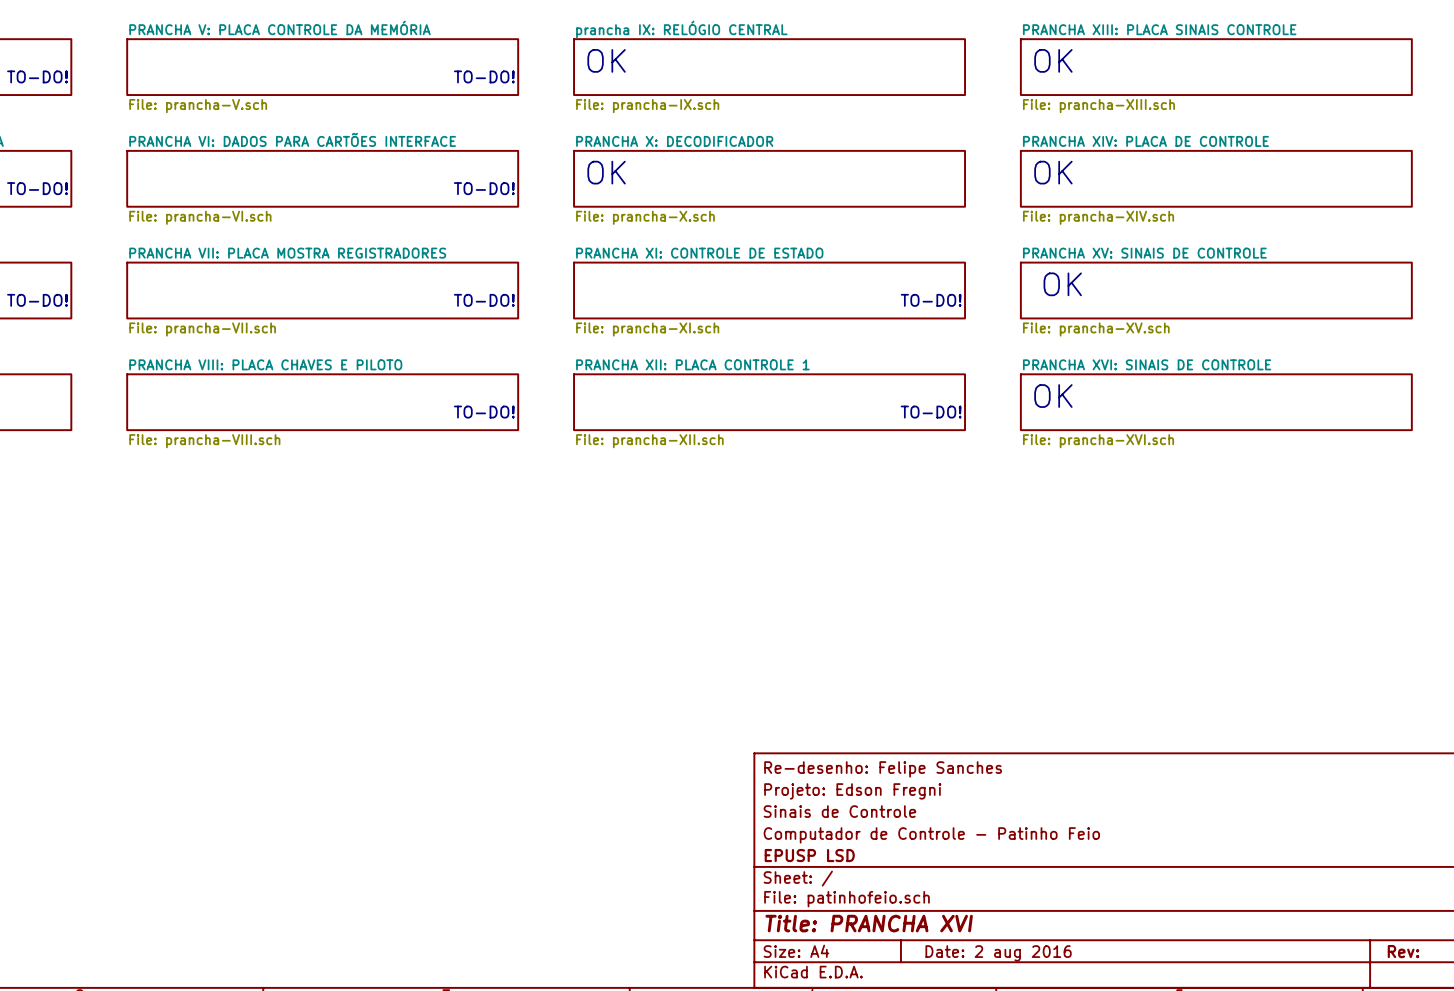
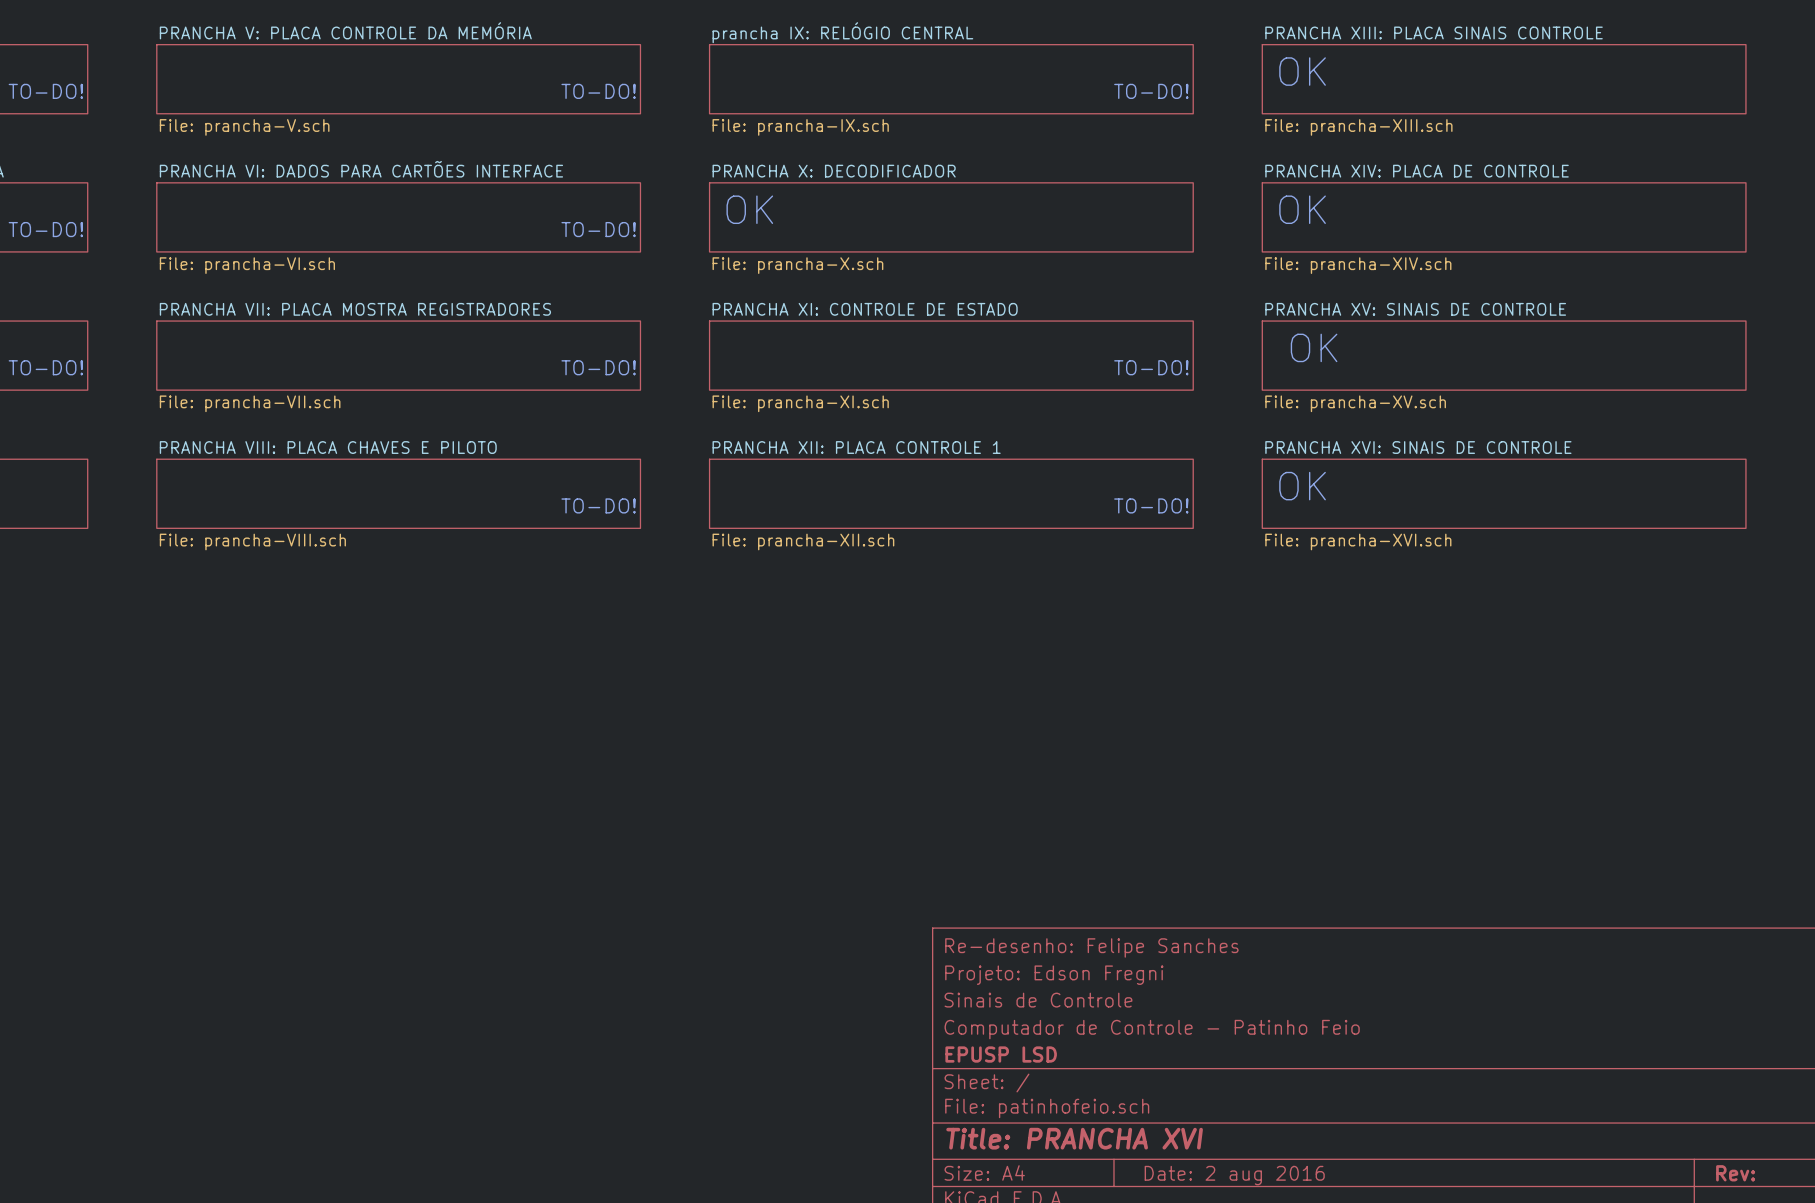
text: OK (606, 60) -> none
text: none -> TO-DO! (1151, 91)

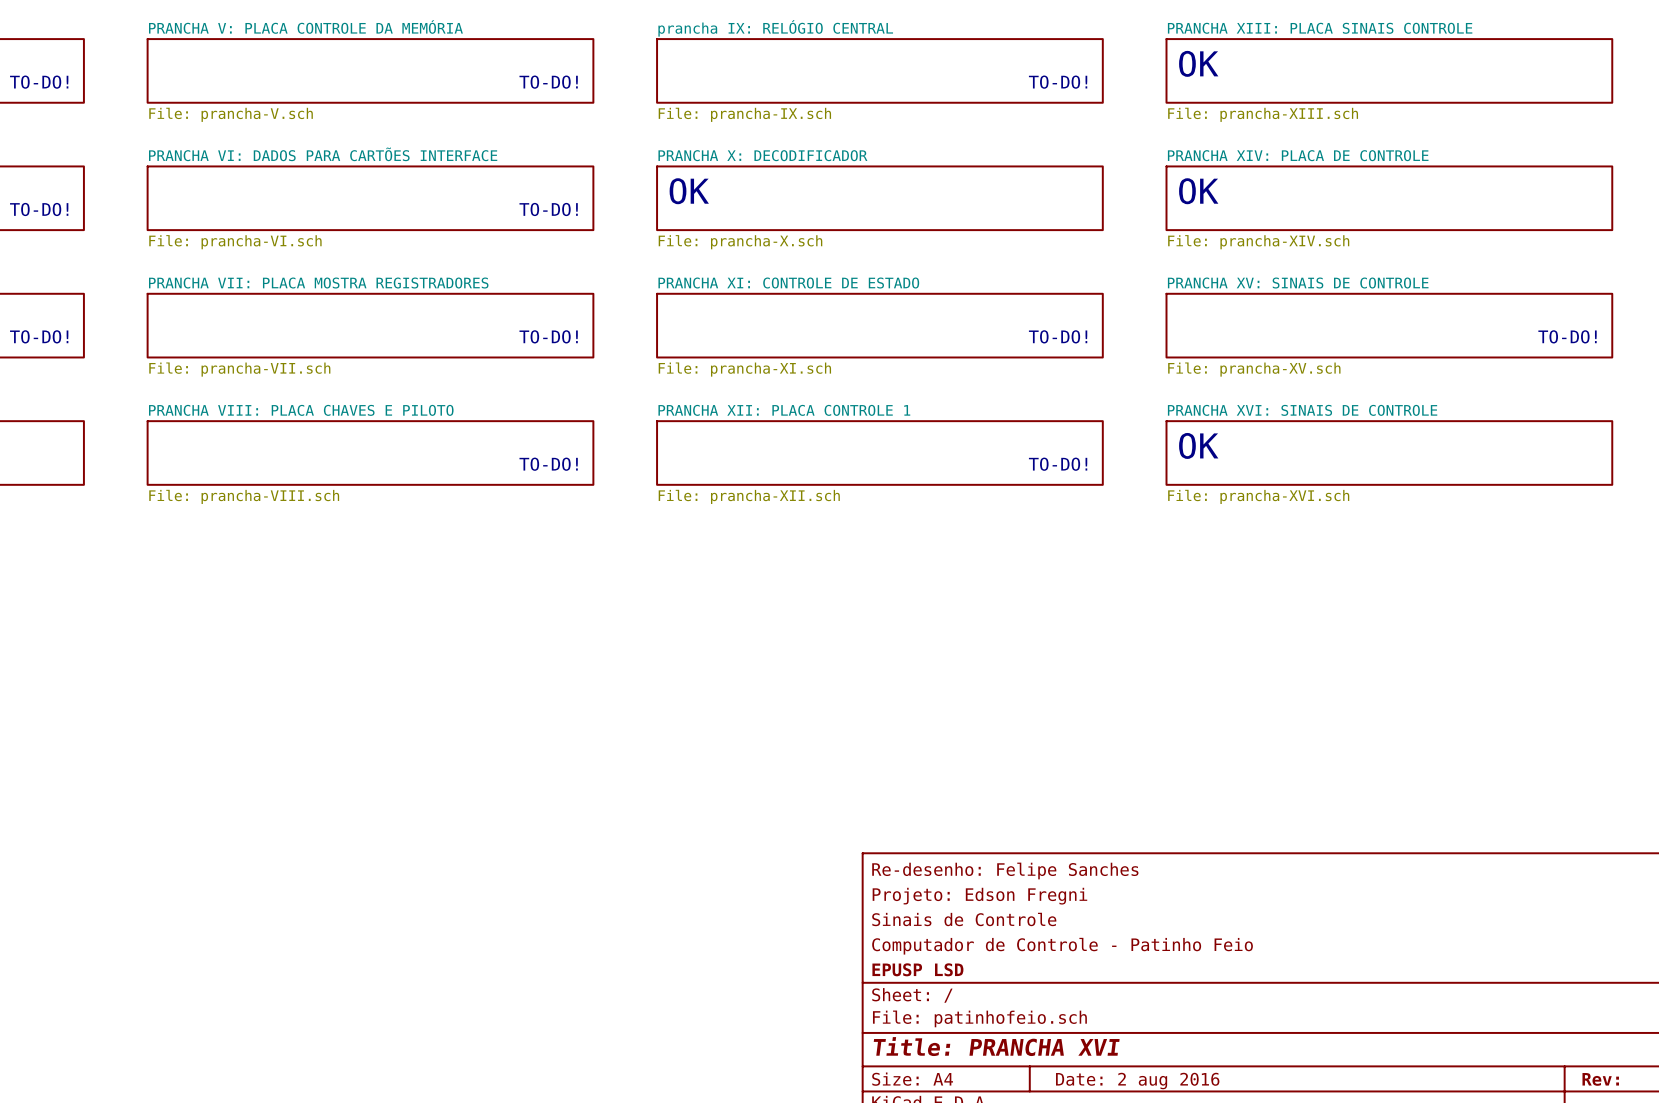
text: OK (1314, 347) -> none
text: none -> TO-DO! (1567, 336)

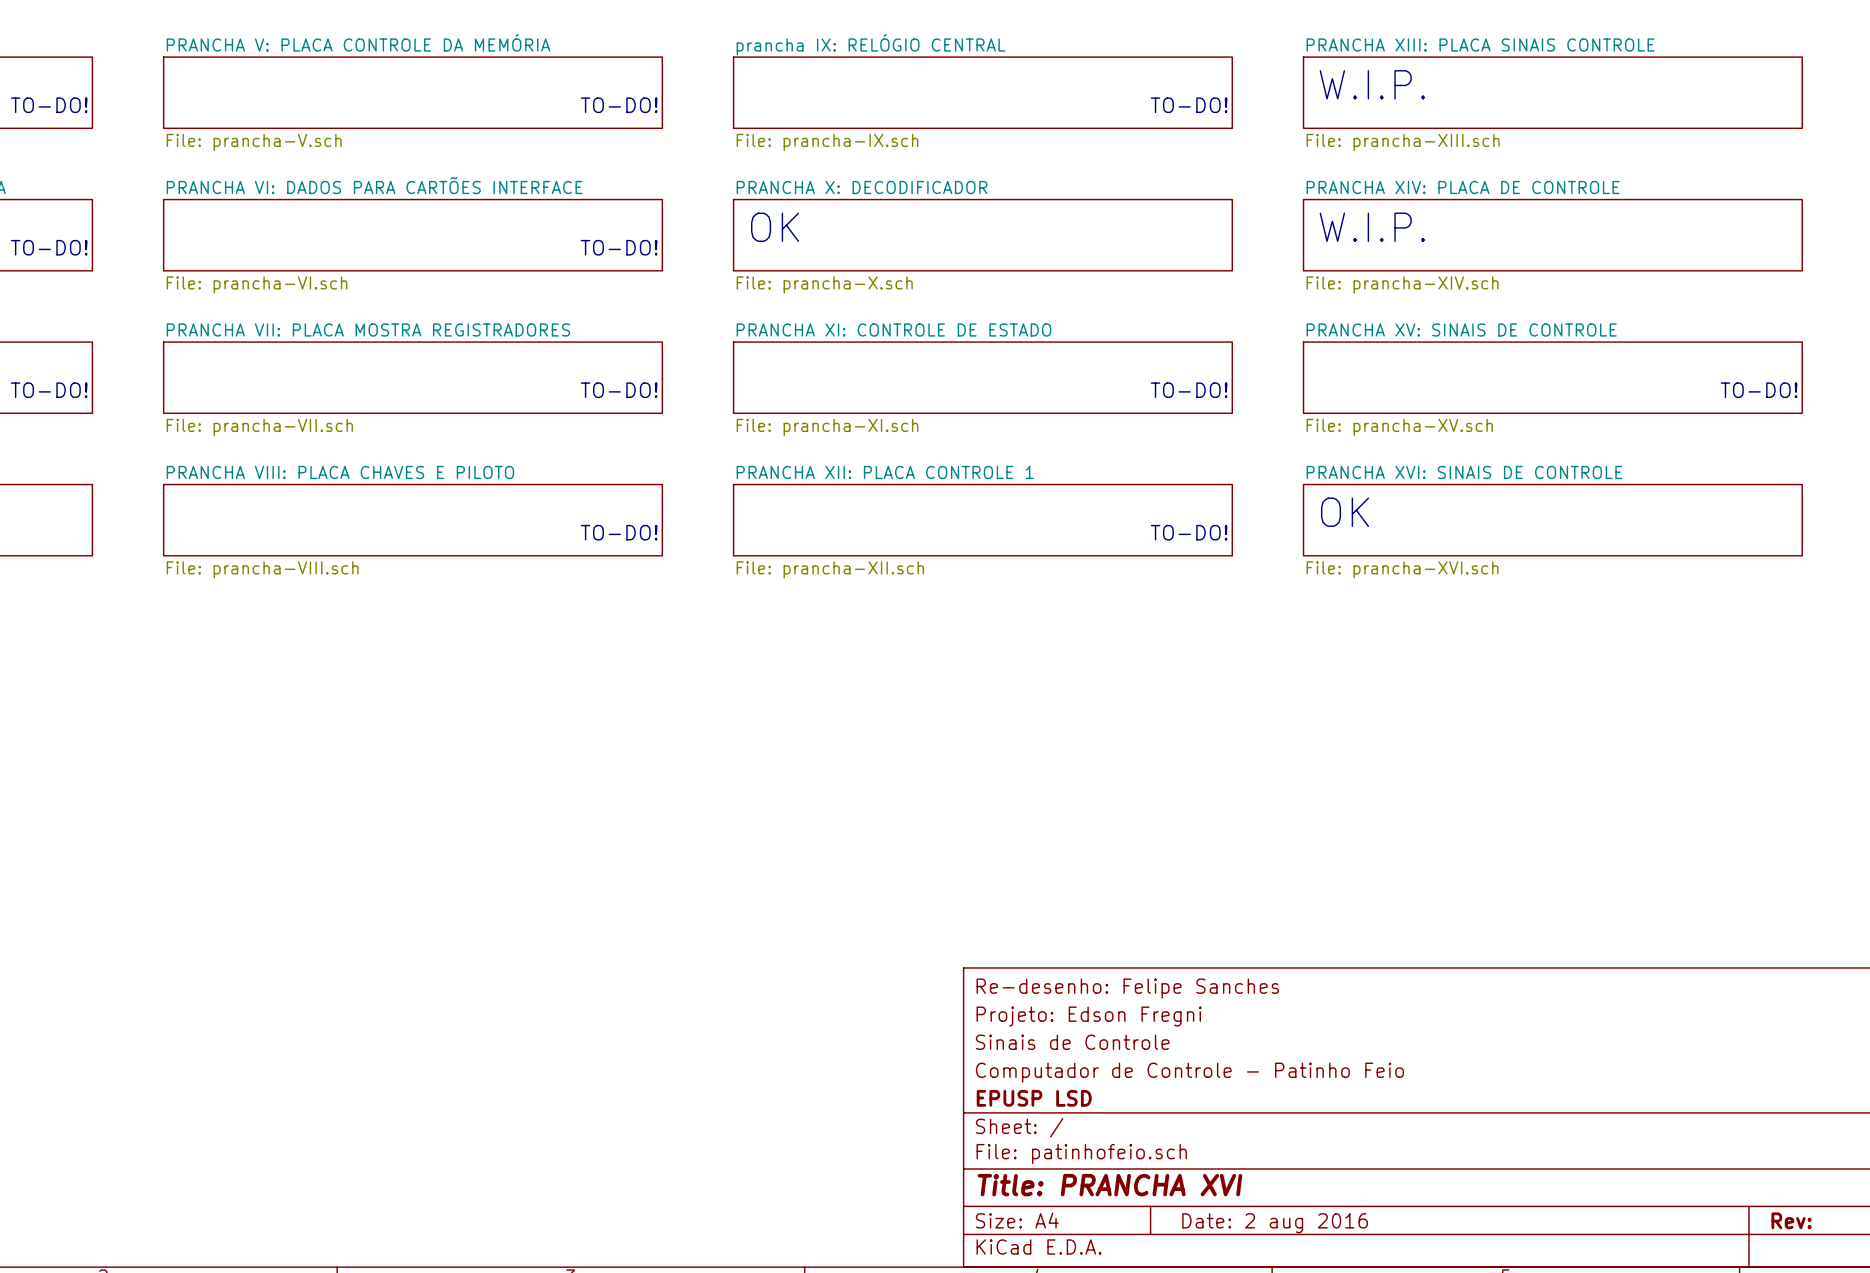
text: OK (1198, 63) -> W.I.P. (1372, 84)
text: OK (1198, 191) -> W.I.P. (1372, 227)

